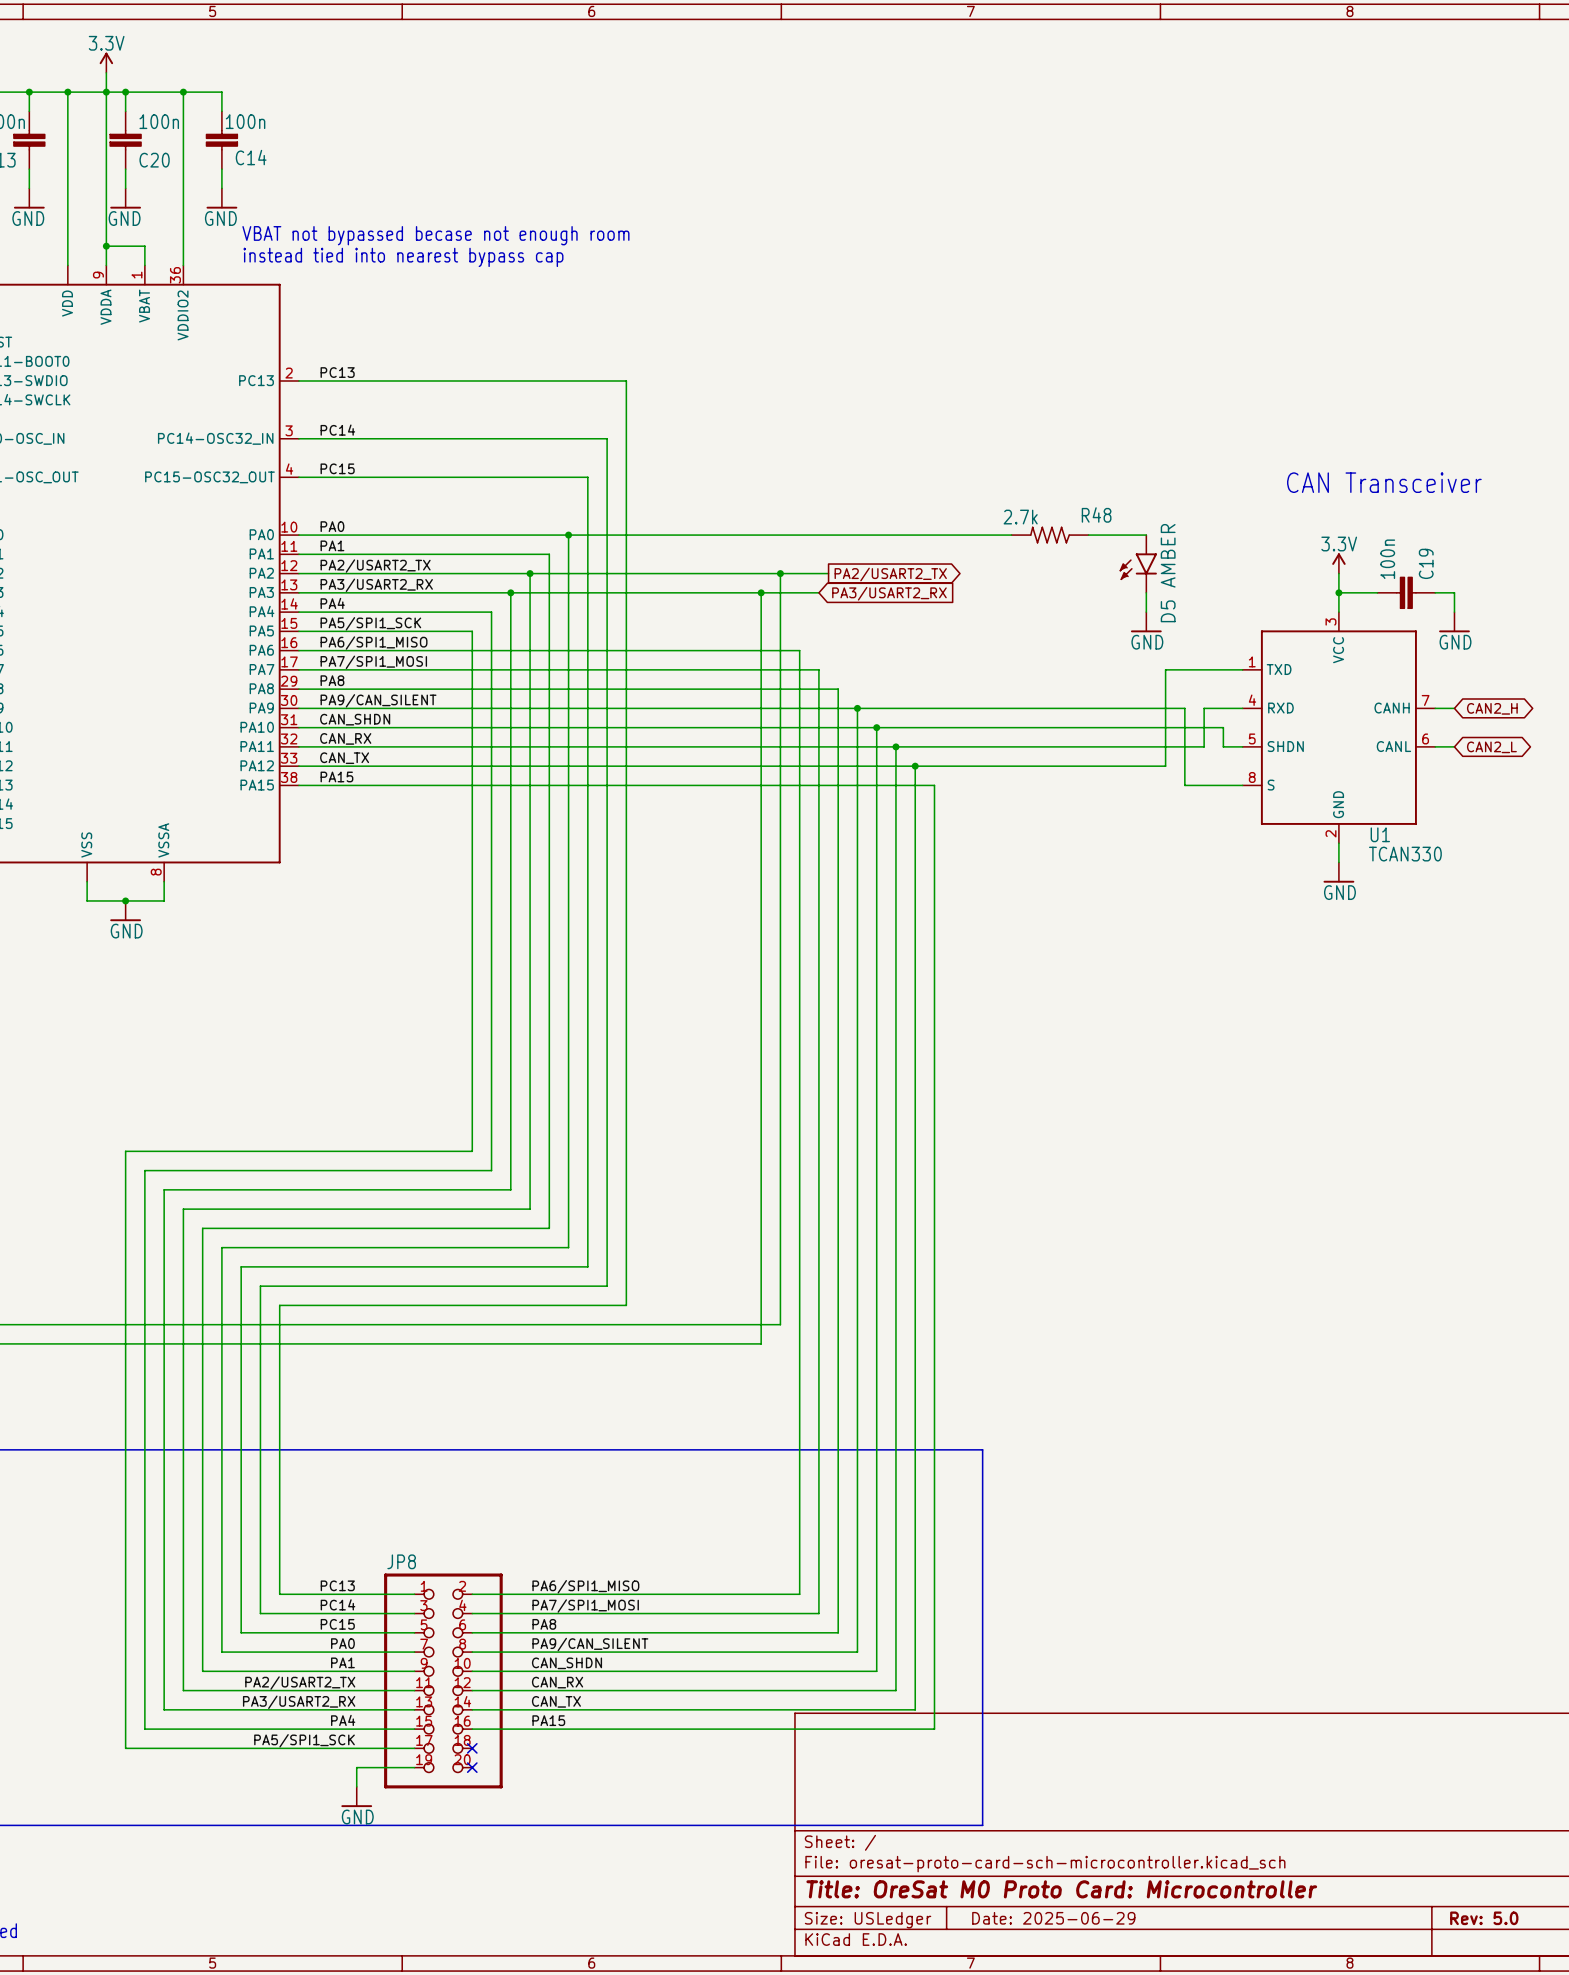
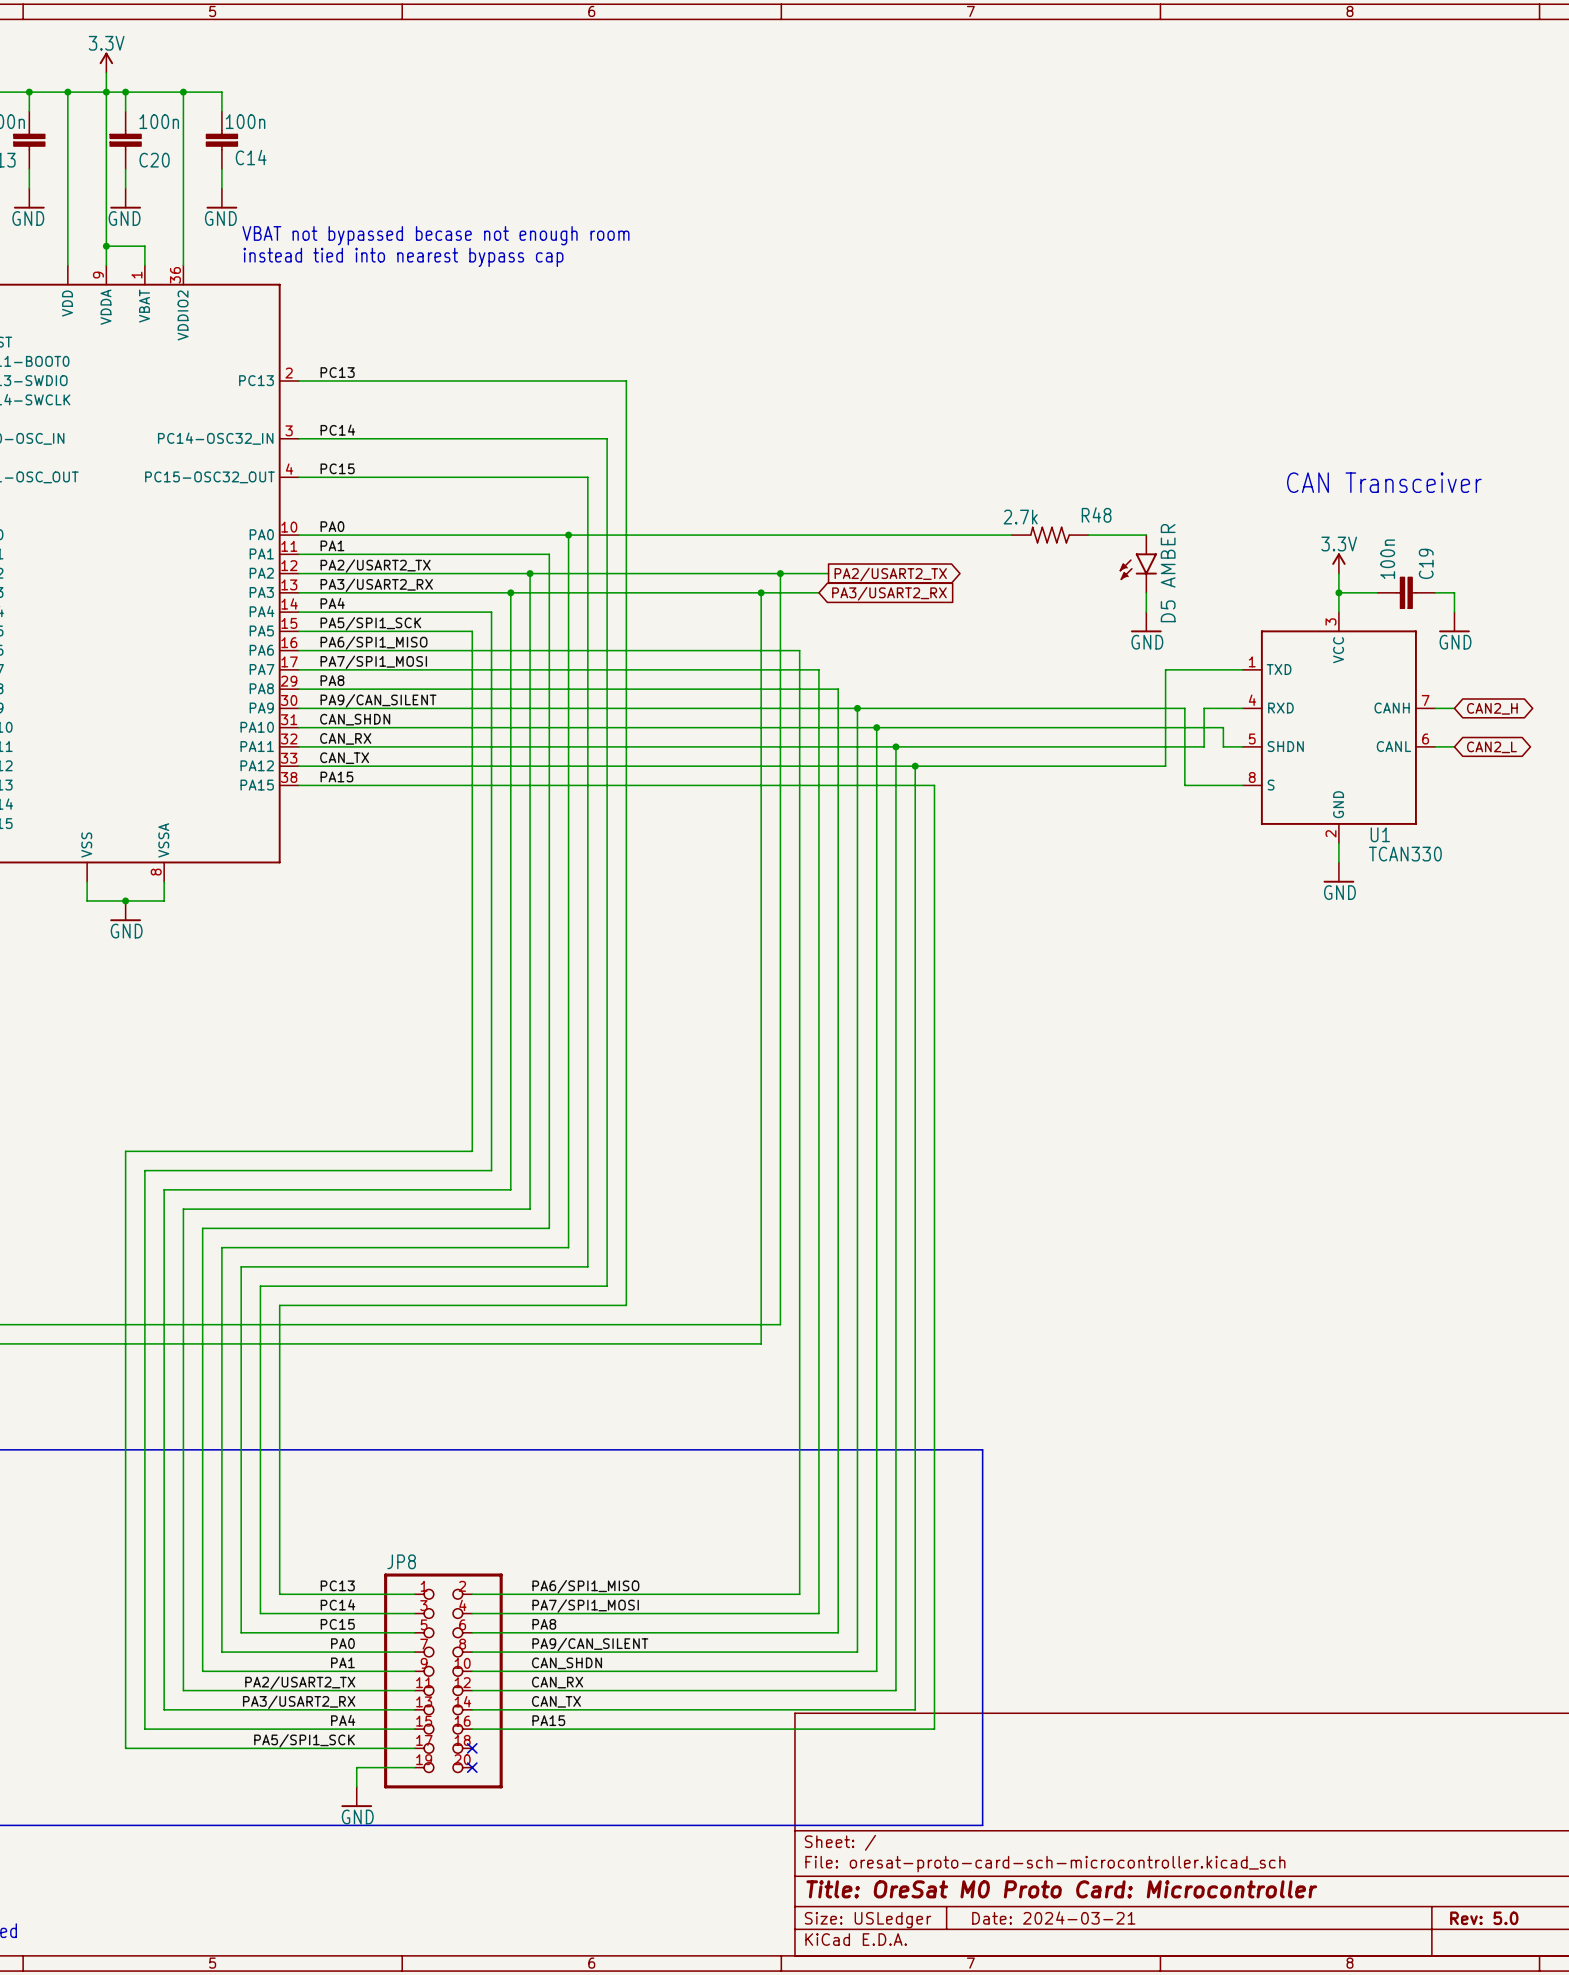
title block: Date: 2025-06-29 (1053, 1918) -> Date: 2024-03-21 (1053, 1918)

